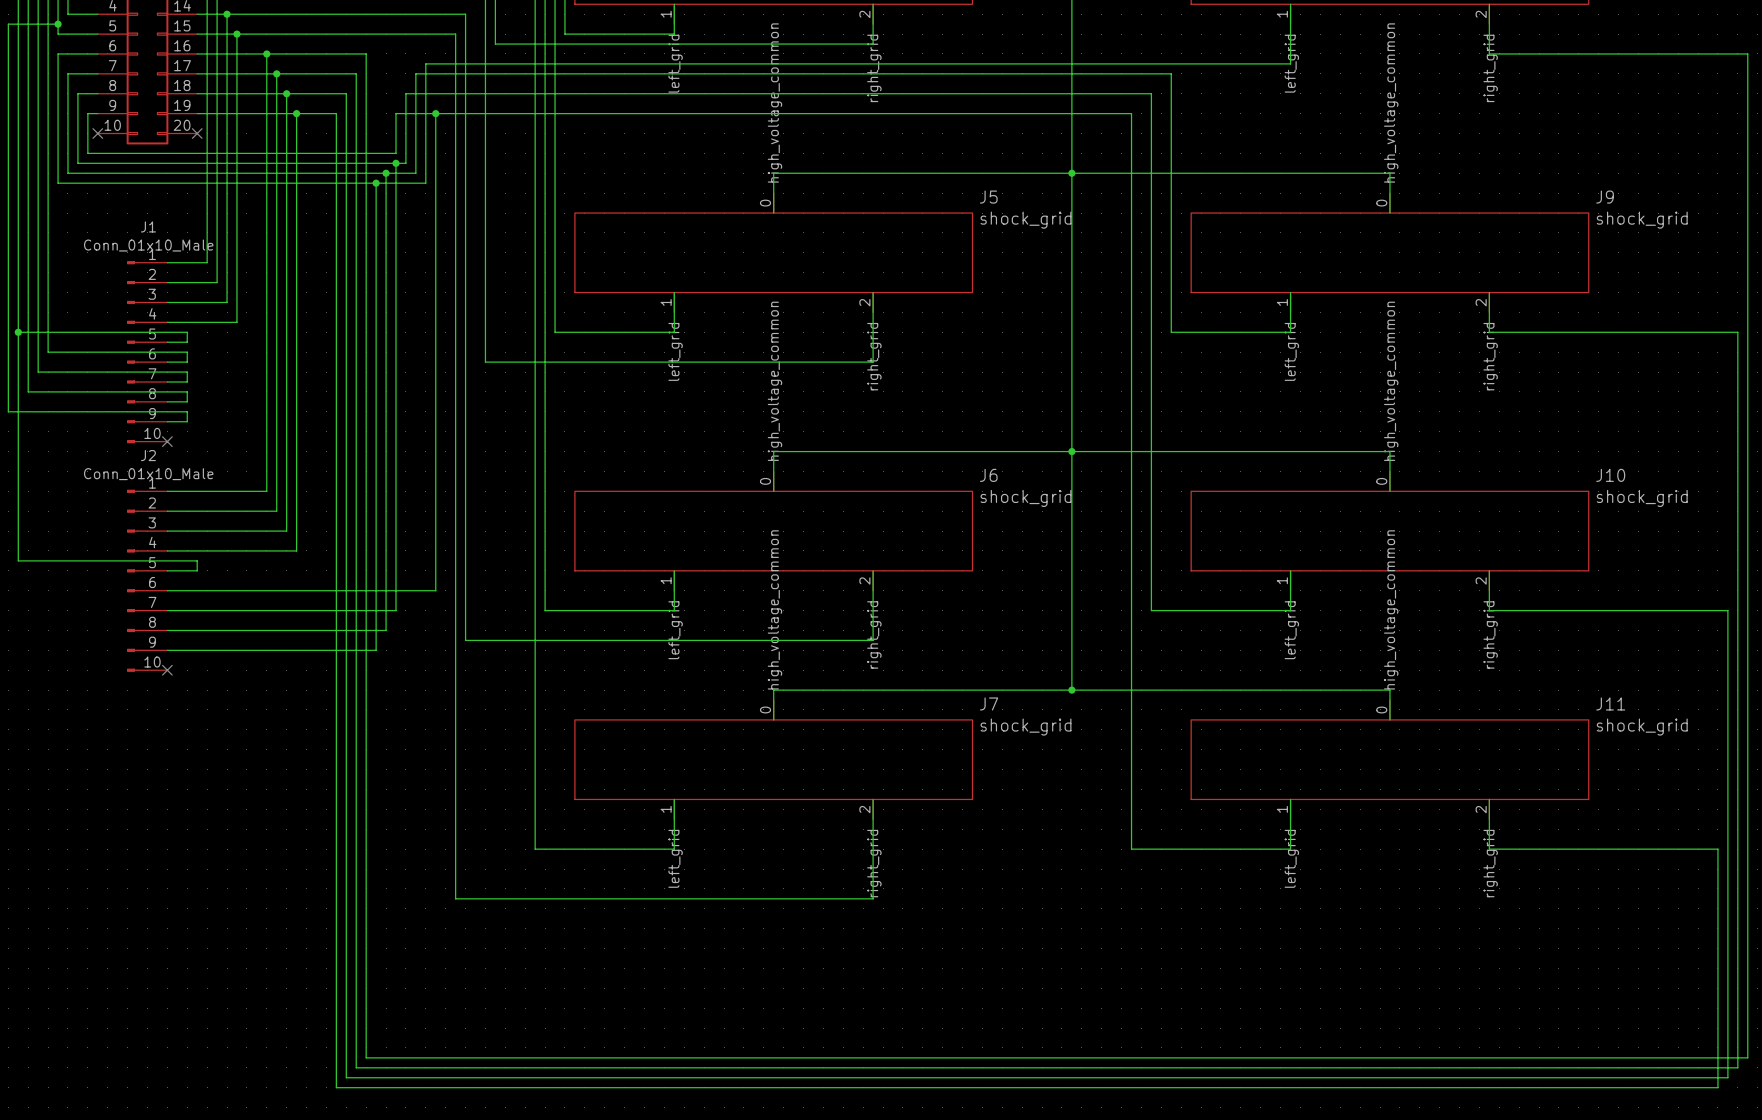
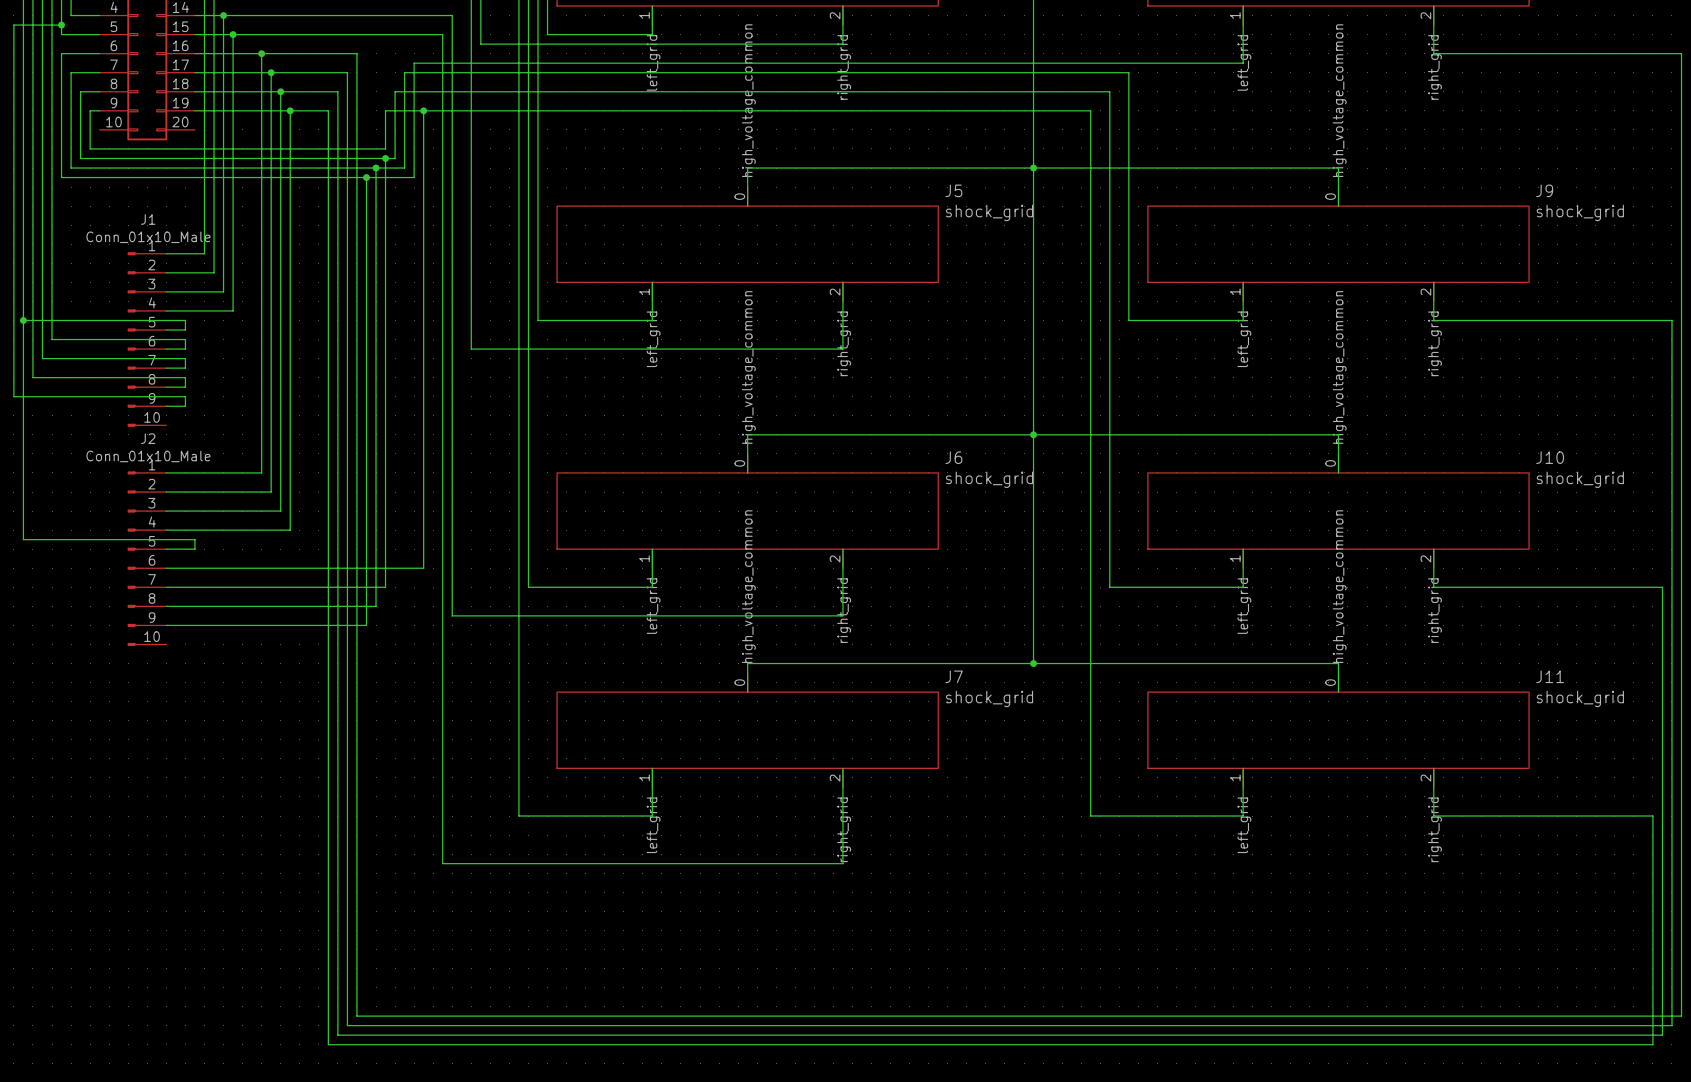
no-connect mark: (97, 133) -> none
no-connect mark: (197, 133) -> none
no-connect mark: (167, 441) -> none
no-connect mark: (167, 670) -> none

